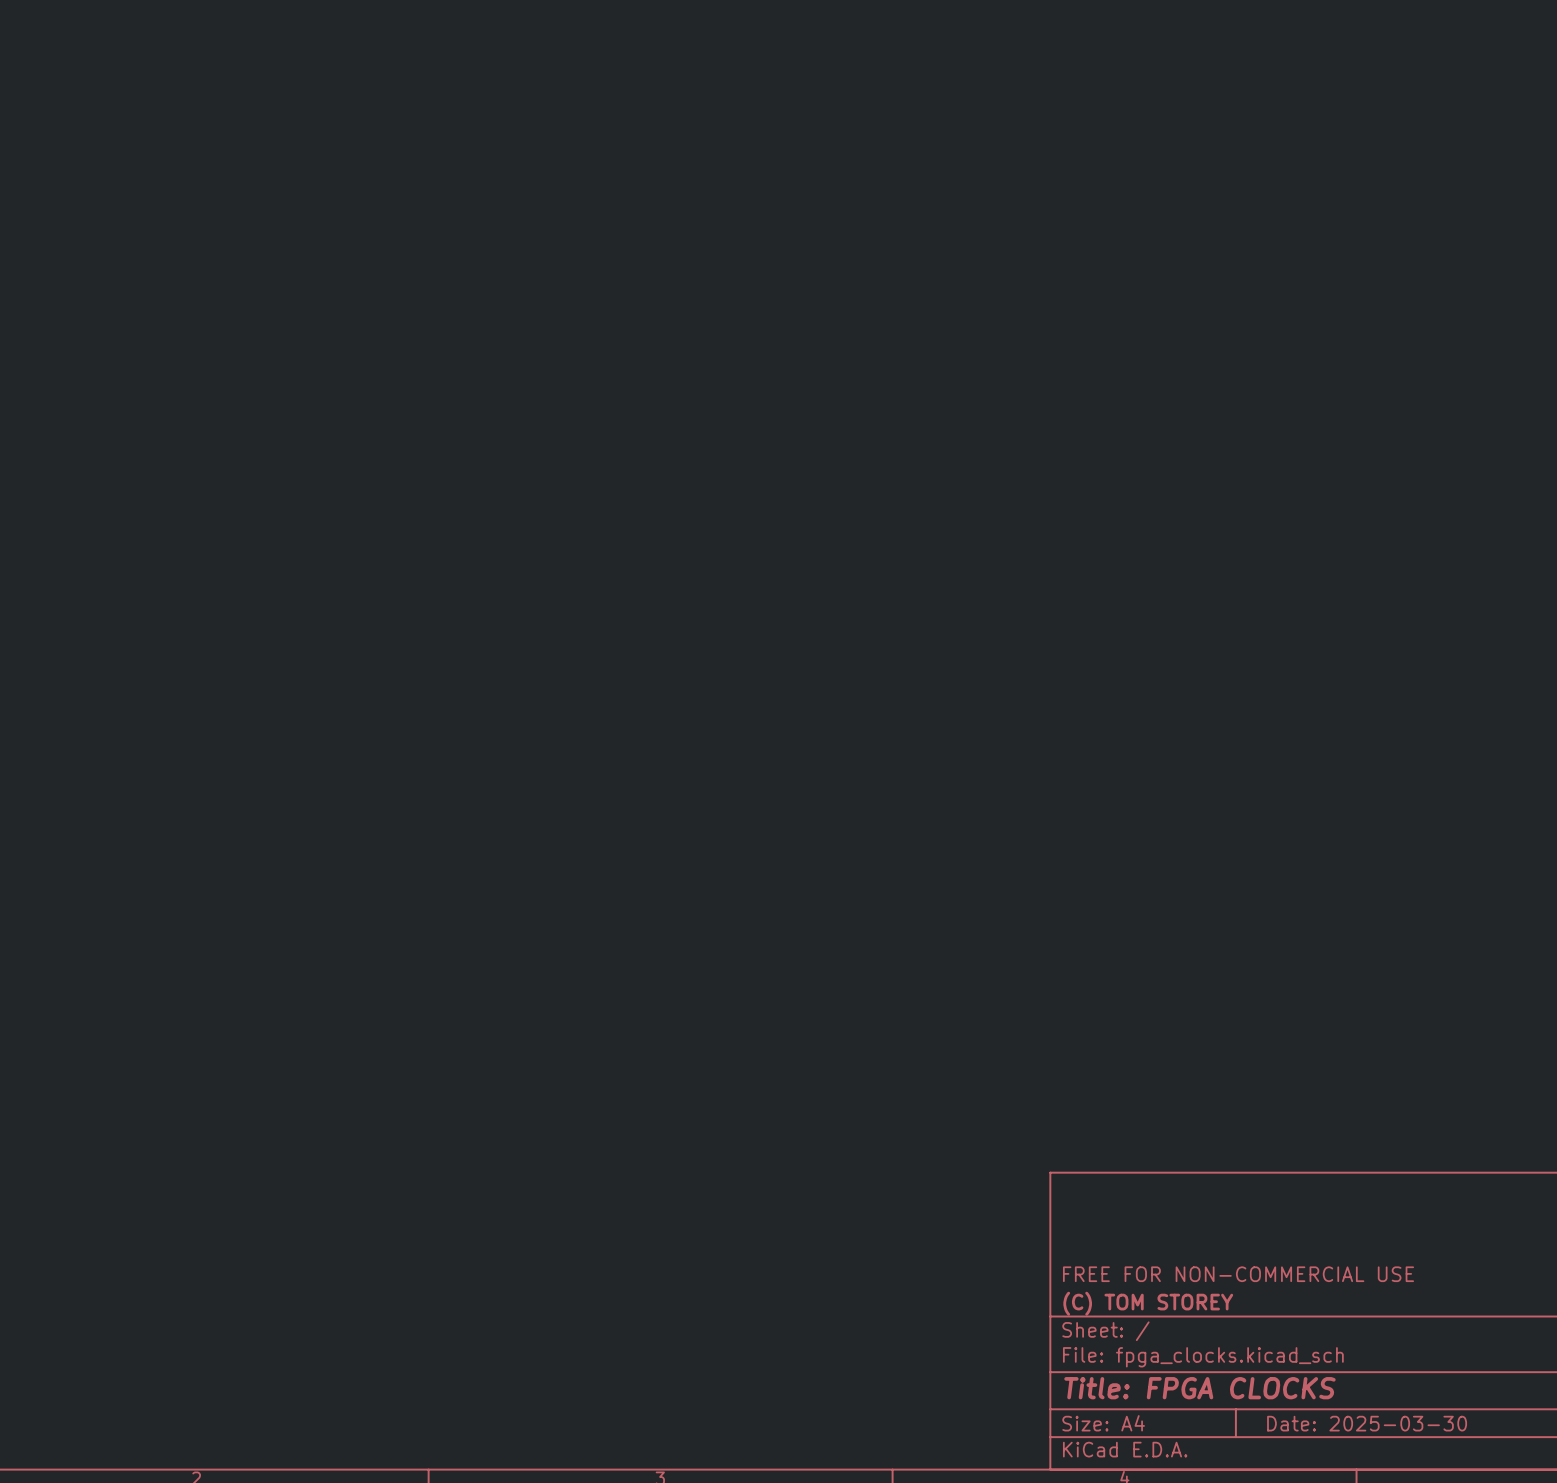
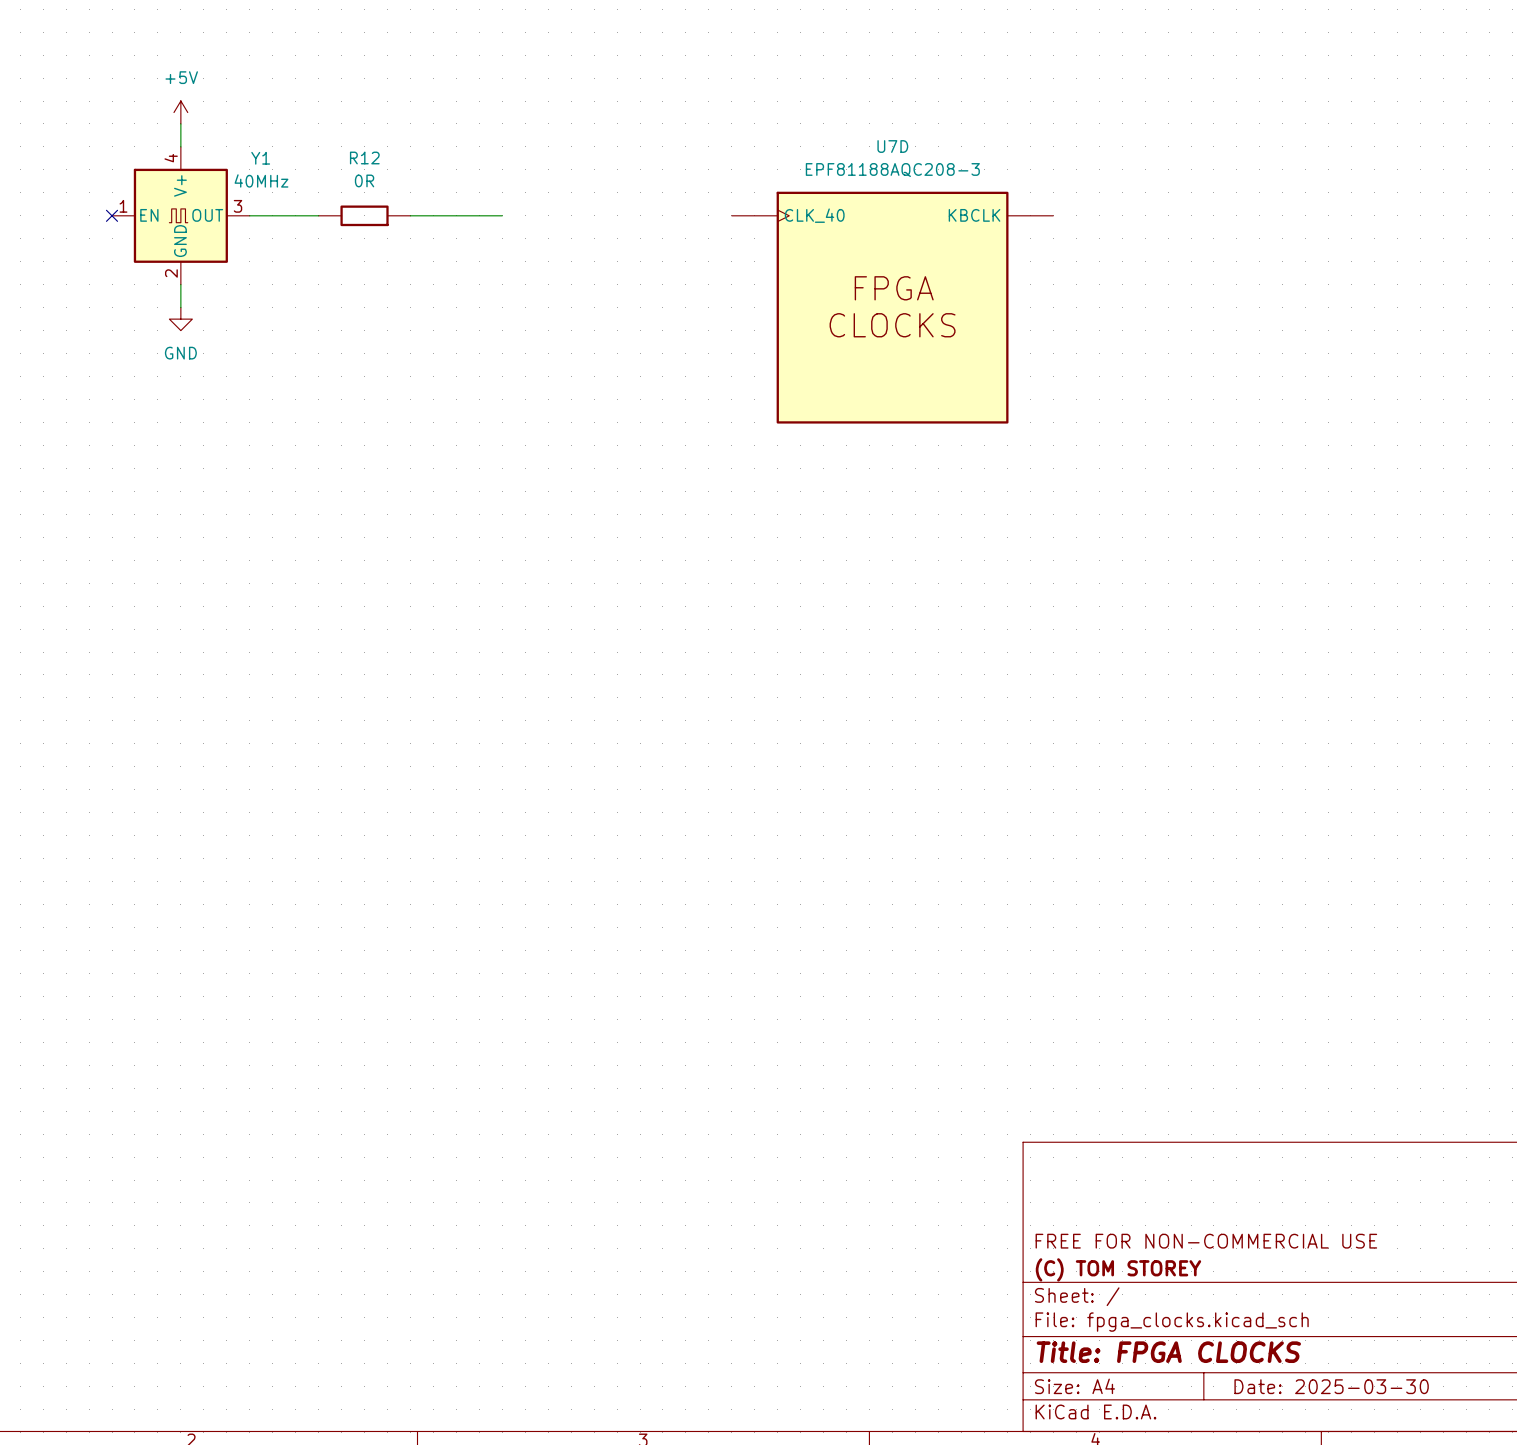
power symbol: none -> +5V (180, 112)
wire: none -> (180, 123) (180, 146)
no-connect mark: none -> (112, 215)
Y1: none -> 40MHz (180, 215)
wire: none -> (249, 215) (318, 215)
R12: none -> 0R (364, 215)
wire: none -> (410, 215) (502, 215)
wire: none -> (180, 284) (180, 307)
U7D: none -> EPF81188AQC208-3 (892, 307)
power symbol: none -> GND (180, 319)

